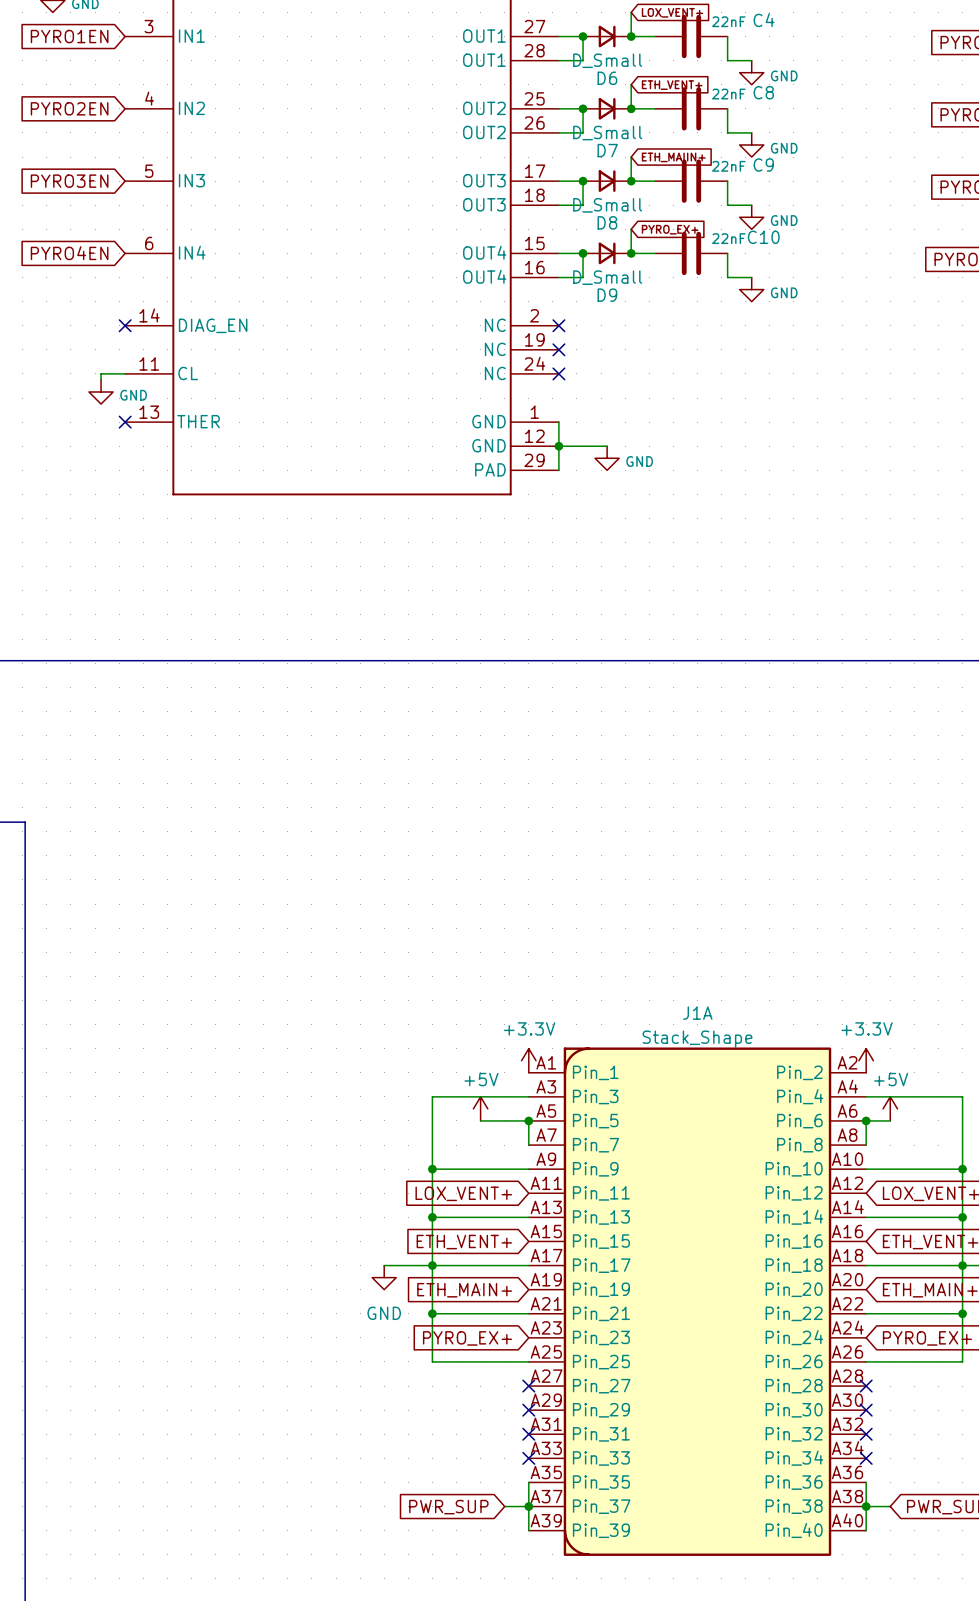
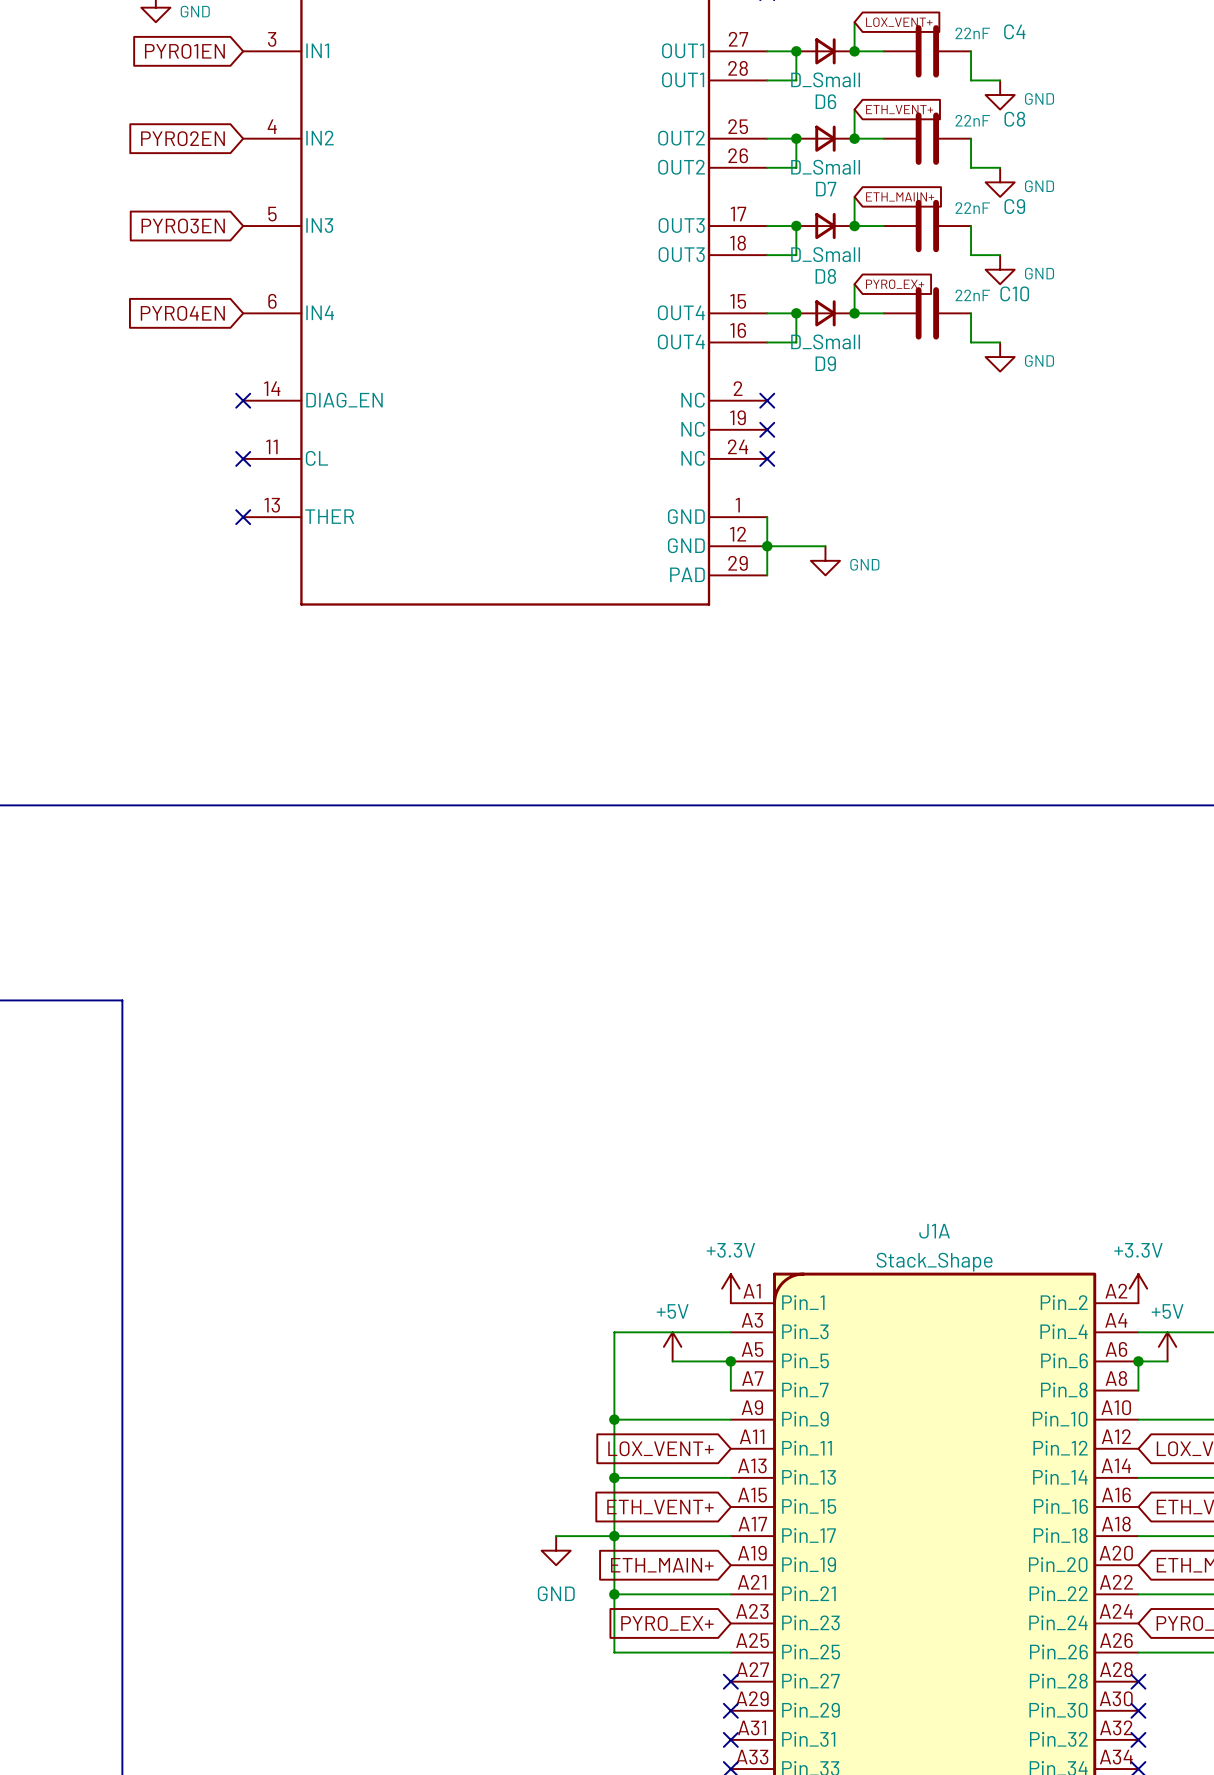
wire: (125, 373) (101, 373) (101, 379) -> none
no-connect mark: none -> (243, 458)
power symbol: GND (101, 391) -> none

